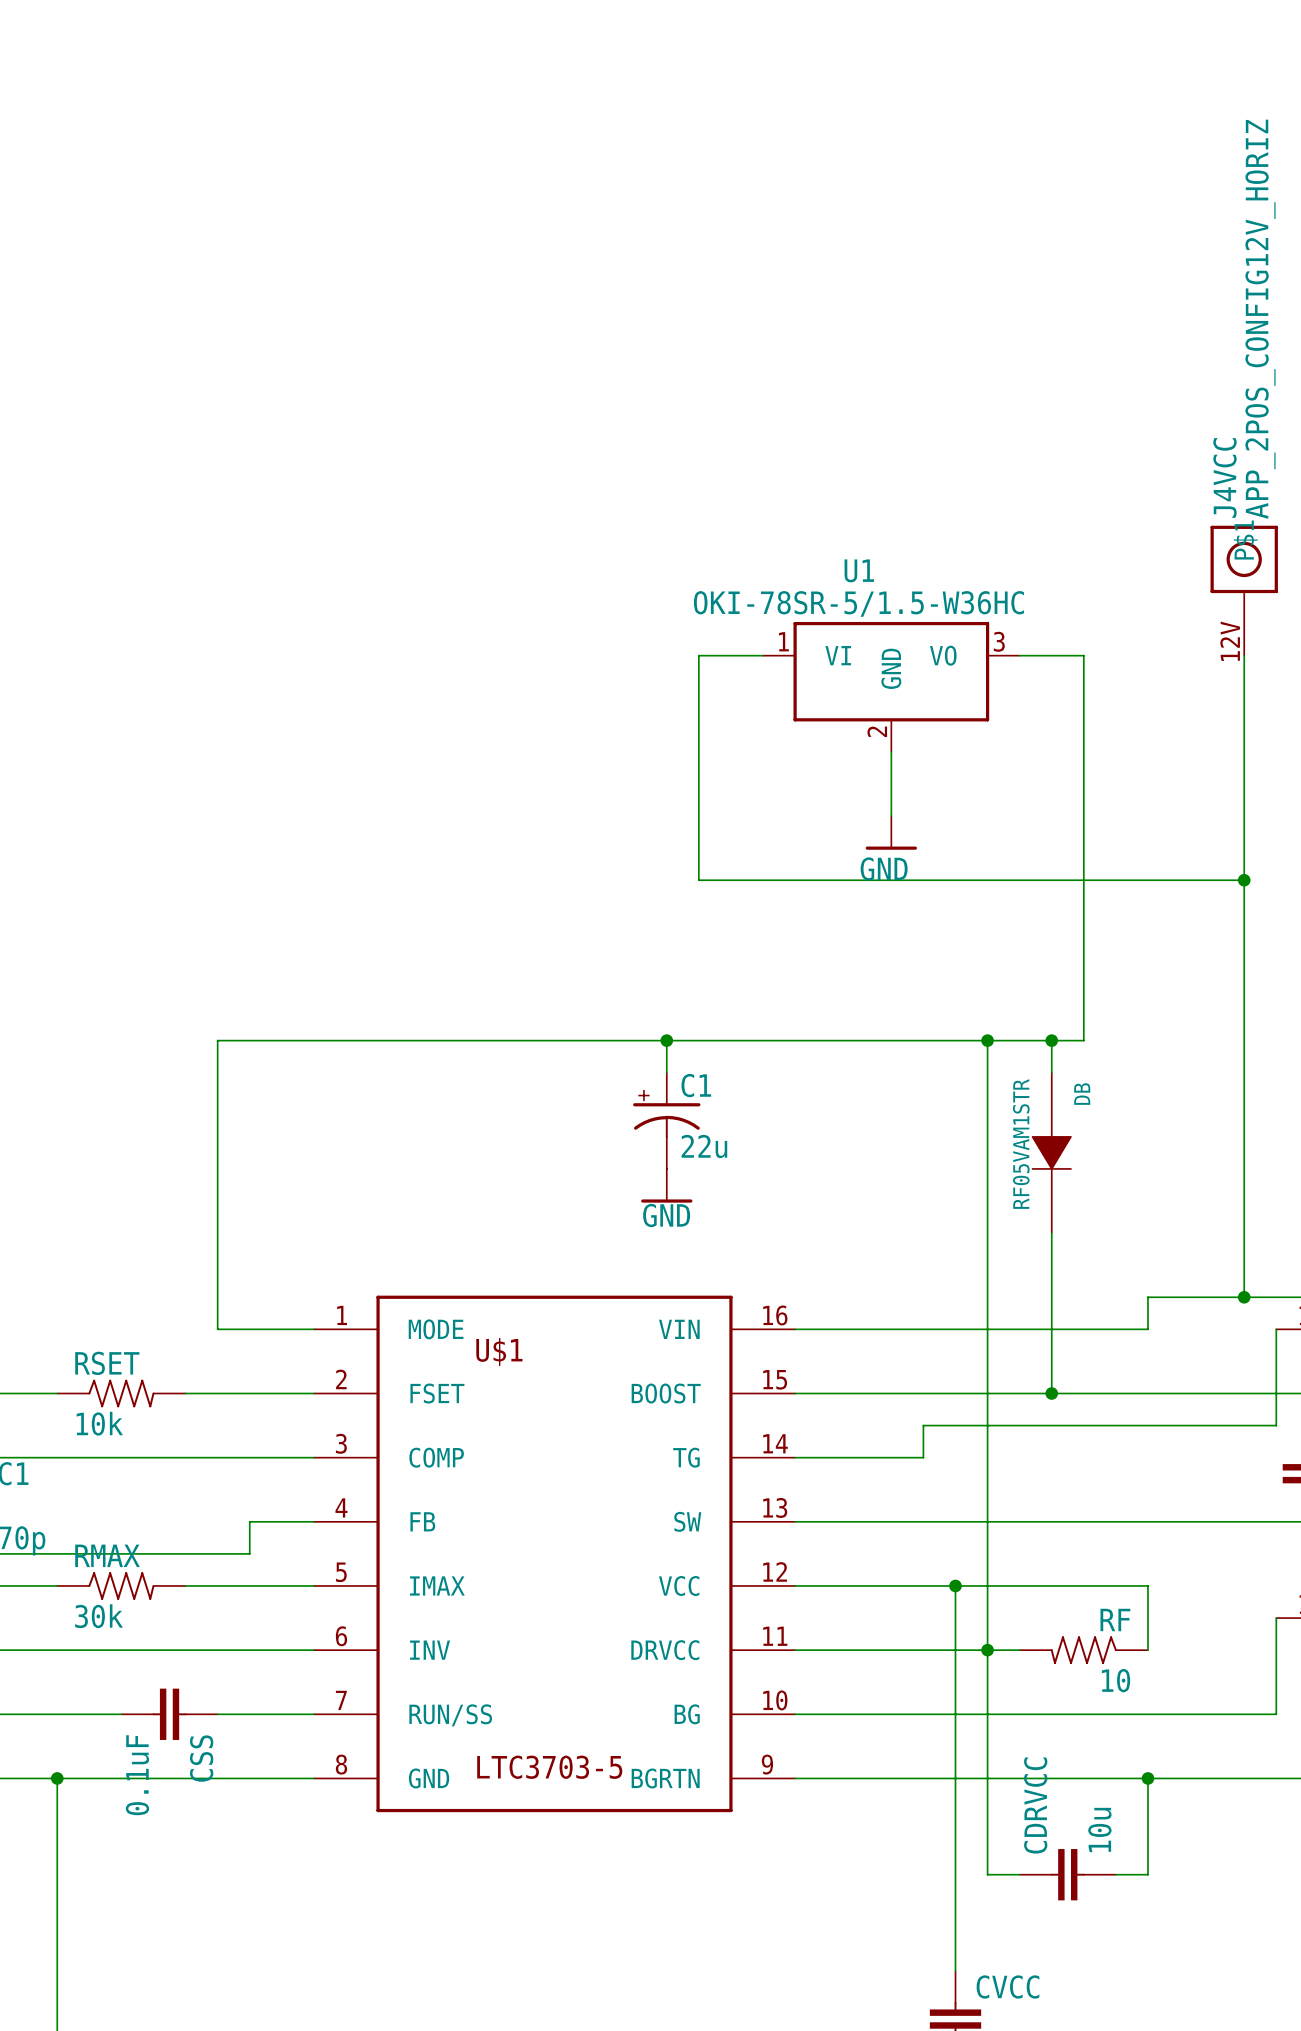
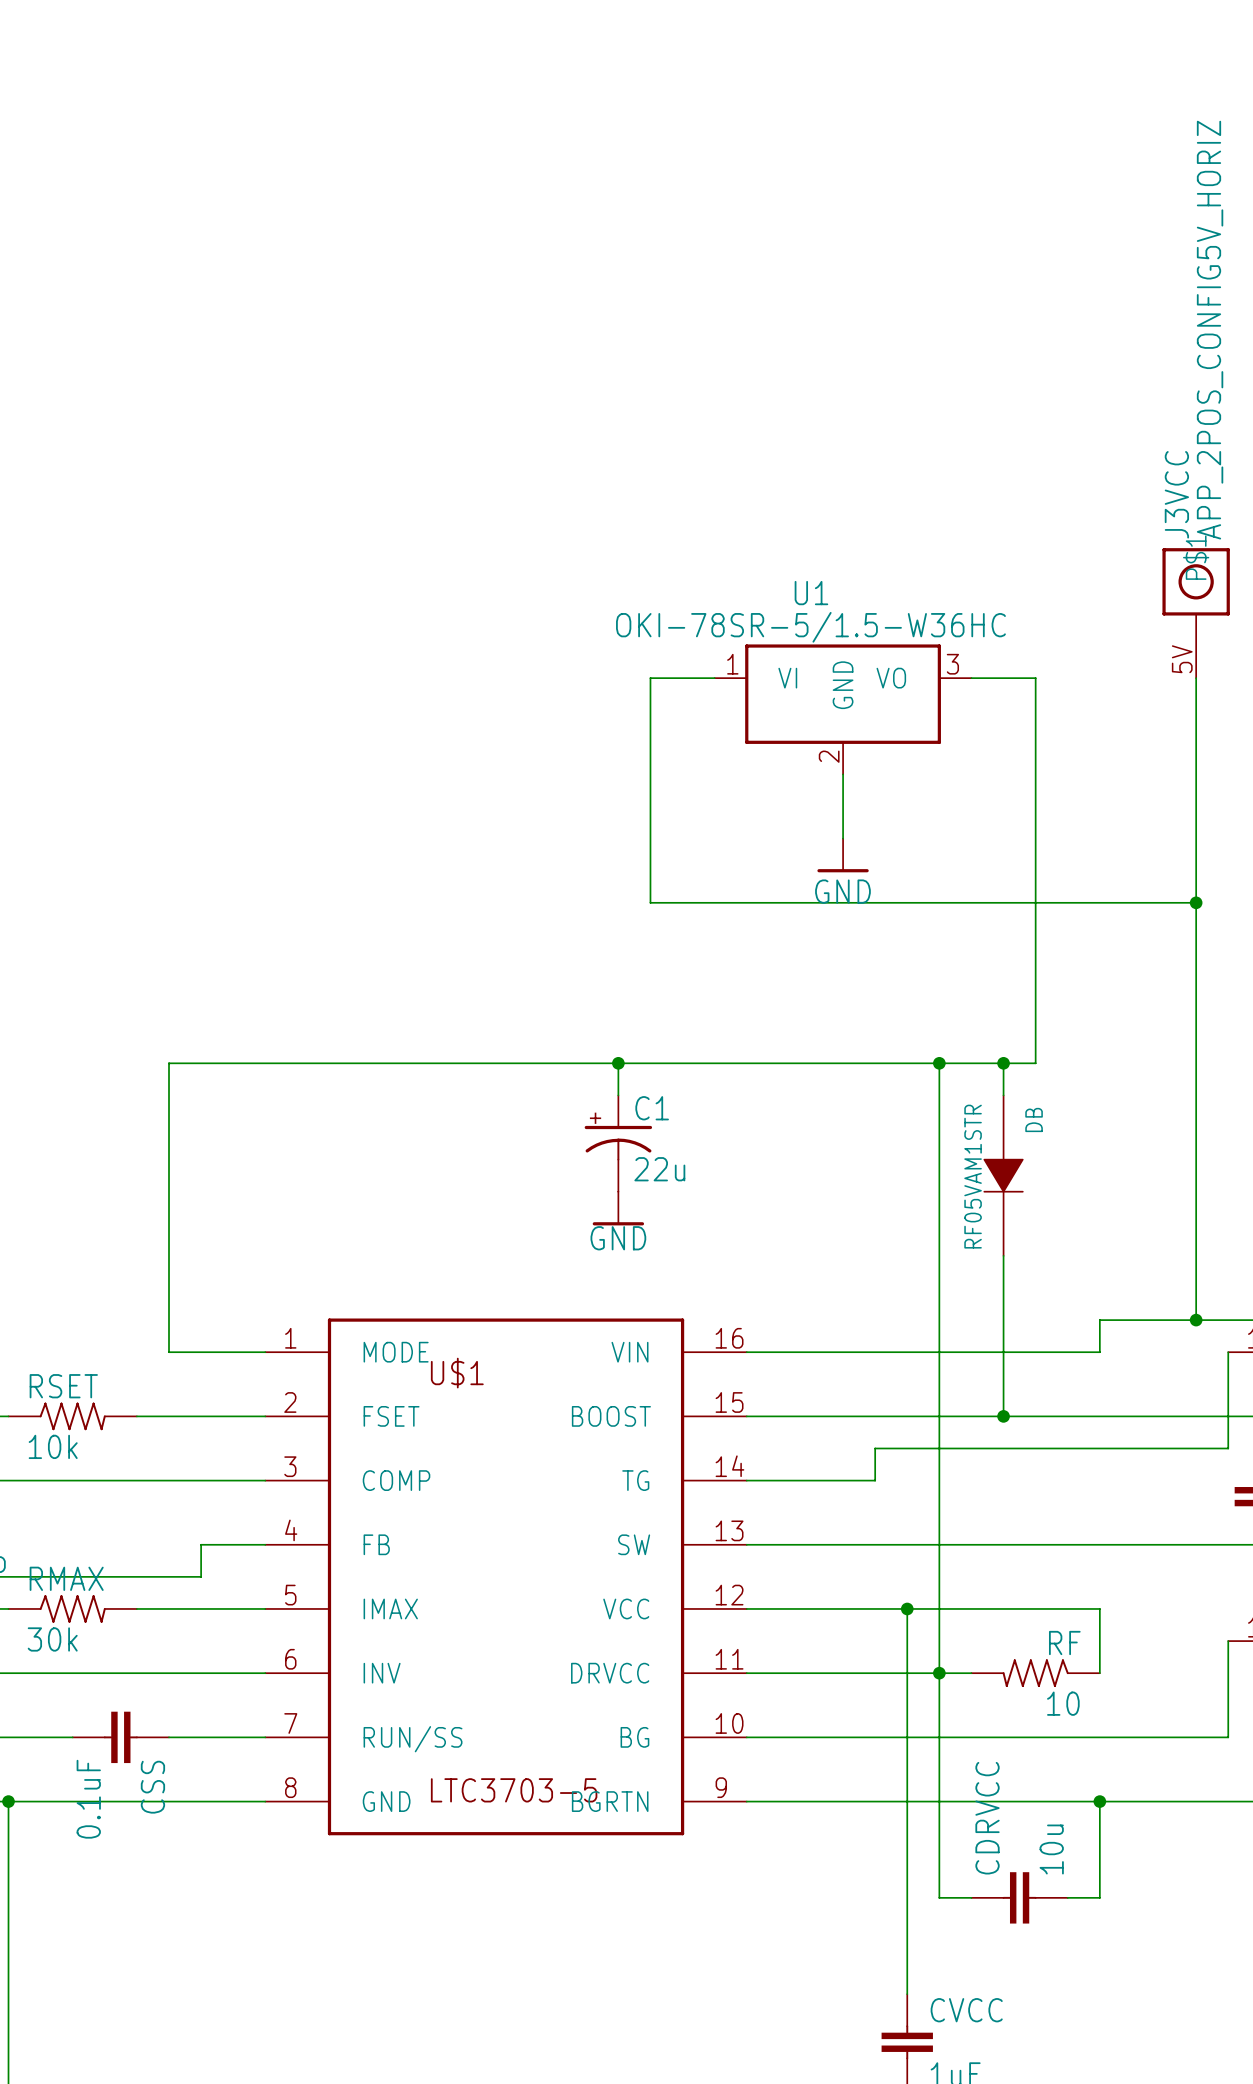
J4VCC value: APP_2POS_CONFIG12V_HORIZ (1260, 319) -> APP_2POS_CONFIG5V_HORIZ (1210, 330)
J4VCC name: J4VCC (1224, 477) -> J3VCC (1176, 494)
J4VCC pin number: 12V (1230, 641) -> 5V (1182, 659)

